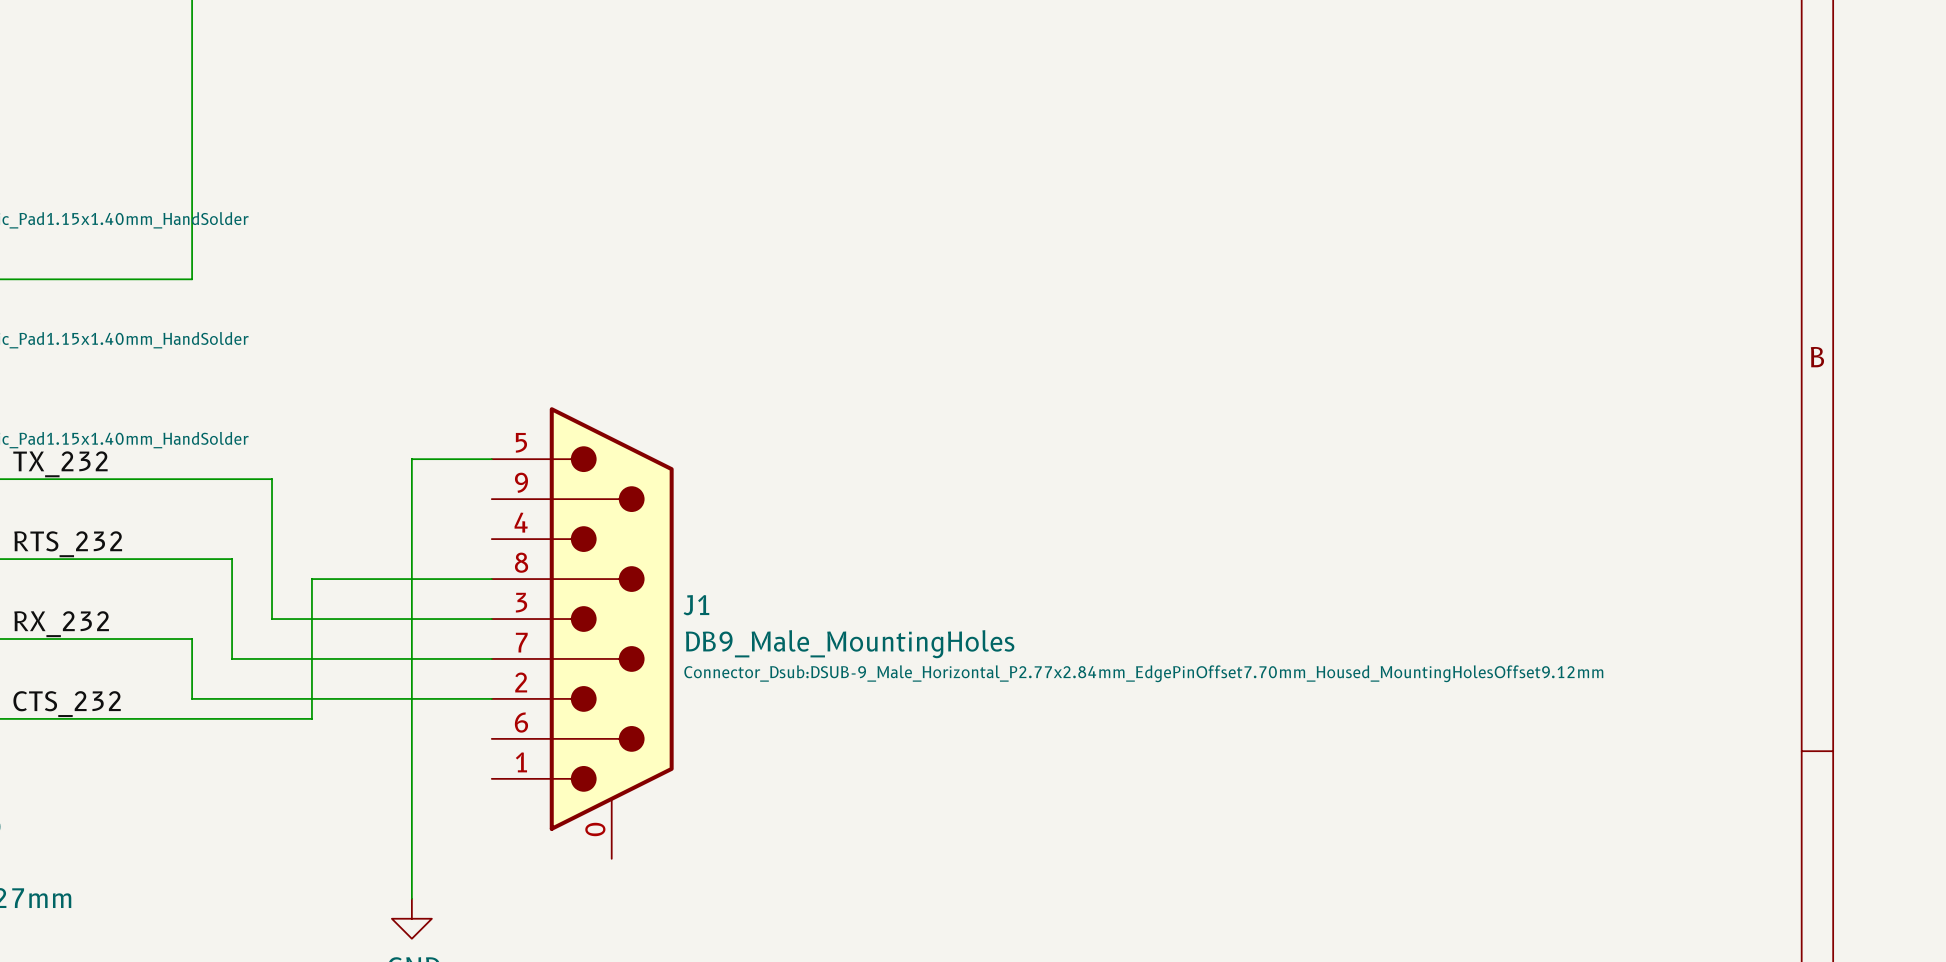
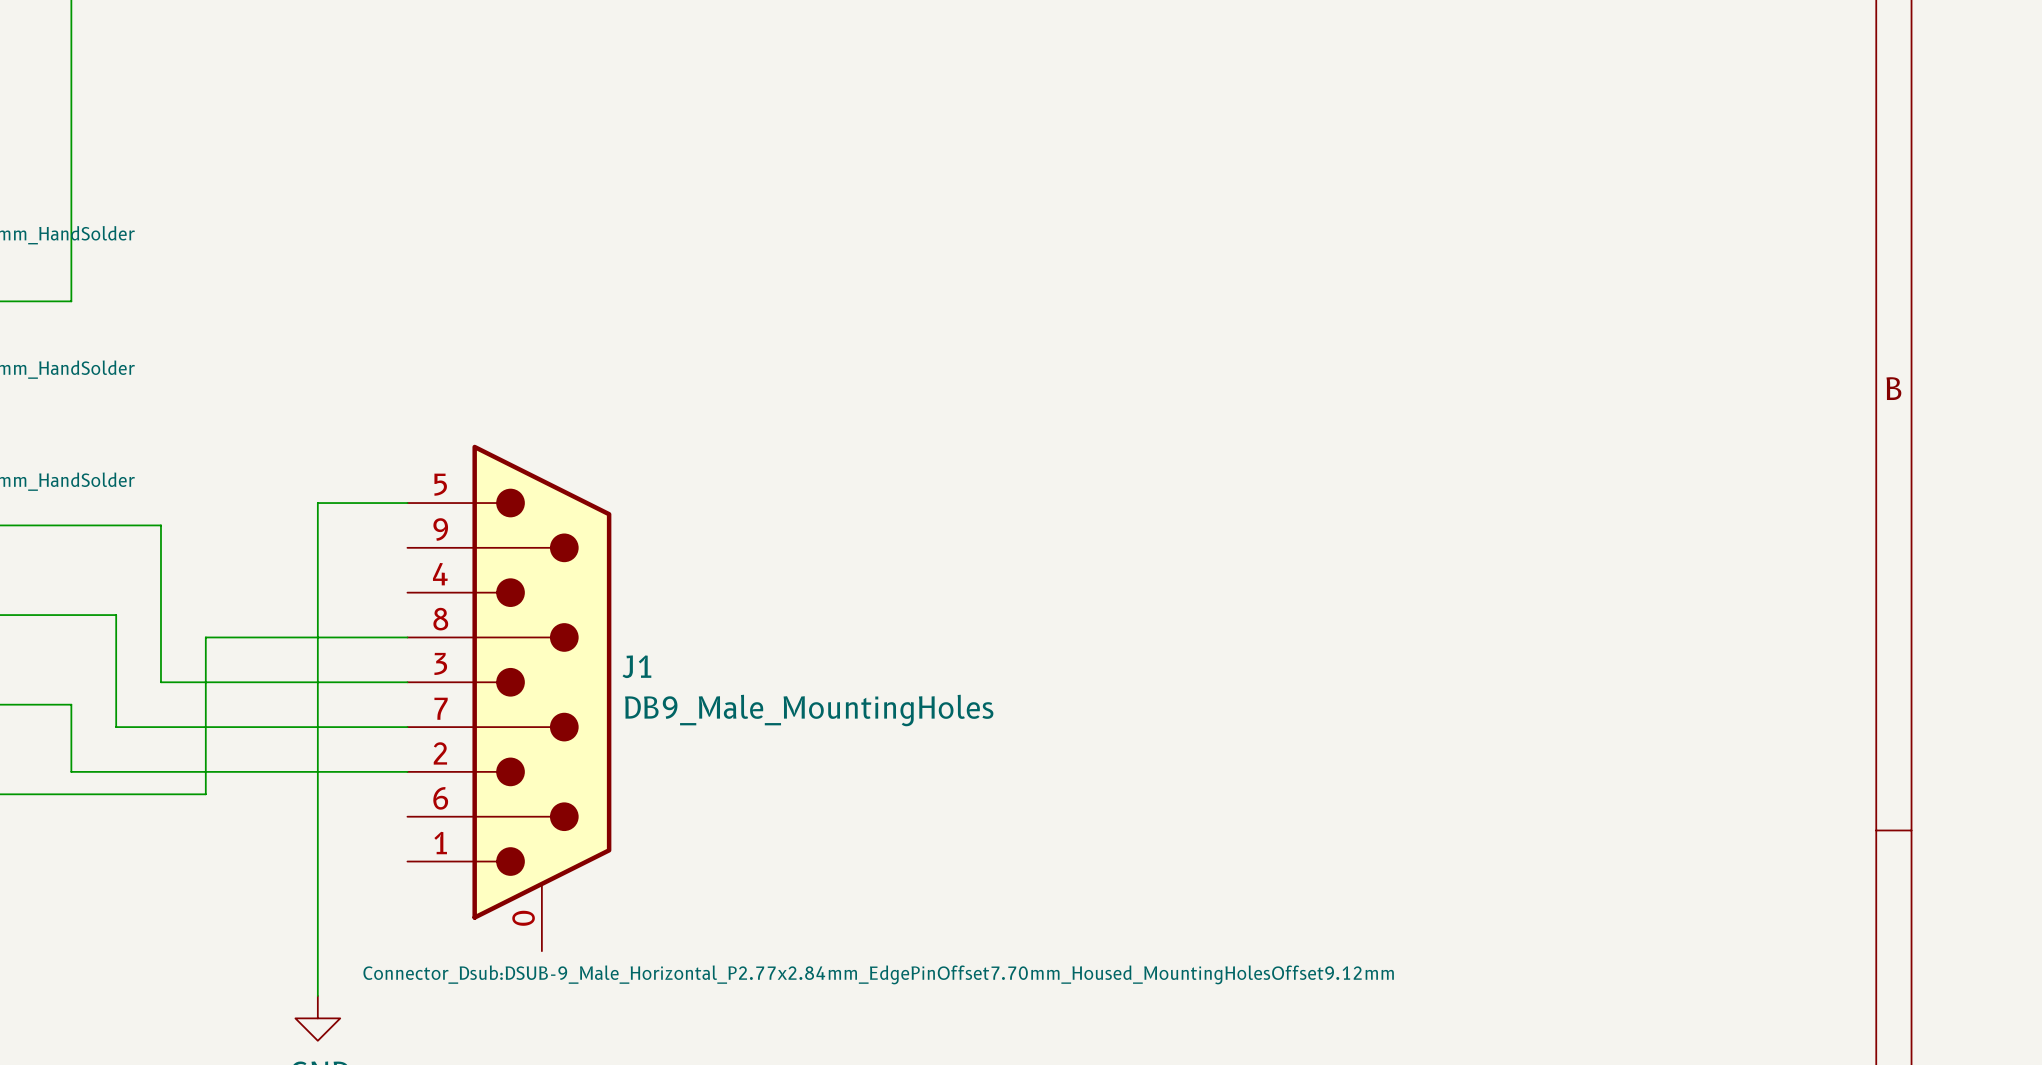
J1 text position: Connector_Dsub:DSUB-9_Male_Horizontal_P2.77x2.84mm_EdgePinOffset7.70mm_Housed_MountingHolesOffset9.12mm (1143, 673) -> Connector_Dsub:DSUB-9_Male_Horizontal_P2.77x2.84mm_EdgePinOffset7.70mm_Housed_MountingHolesOffset9.12mm (878, 974)

